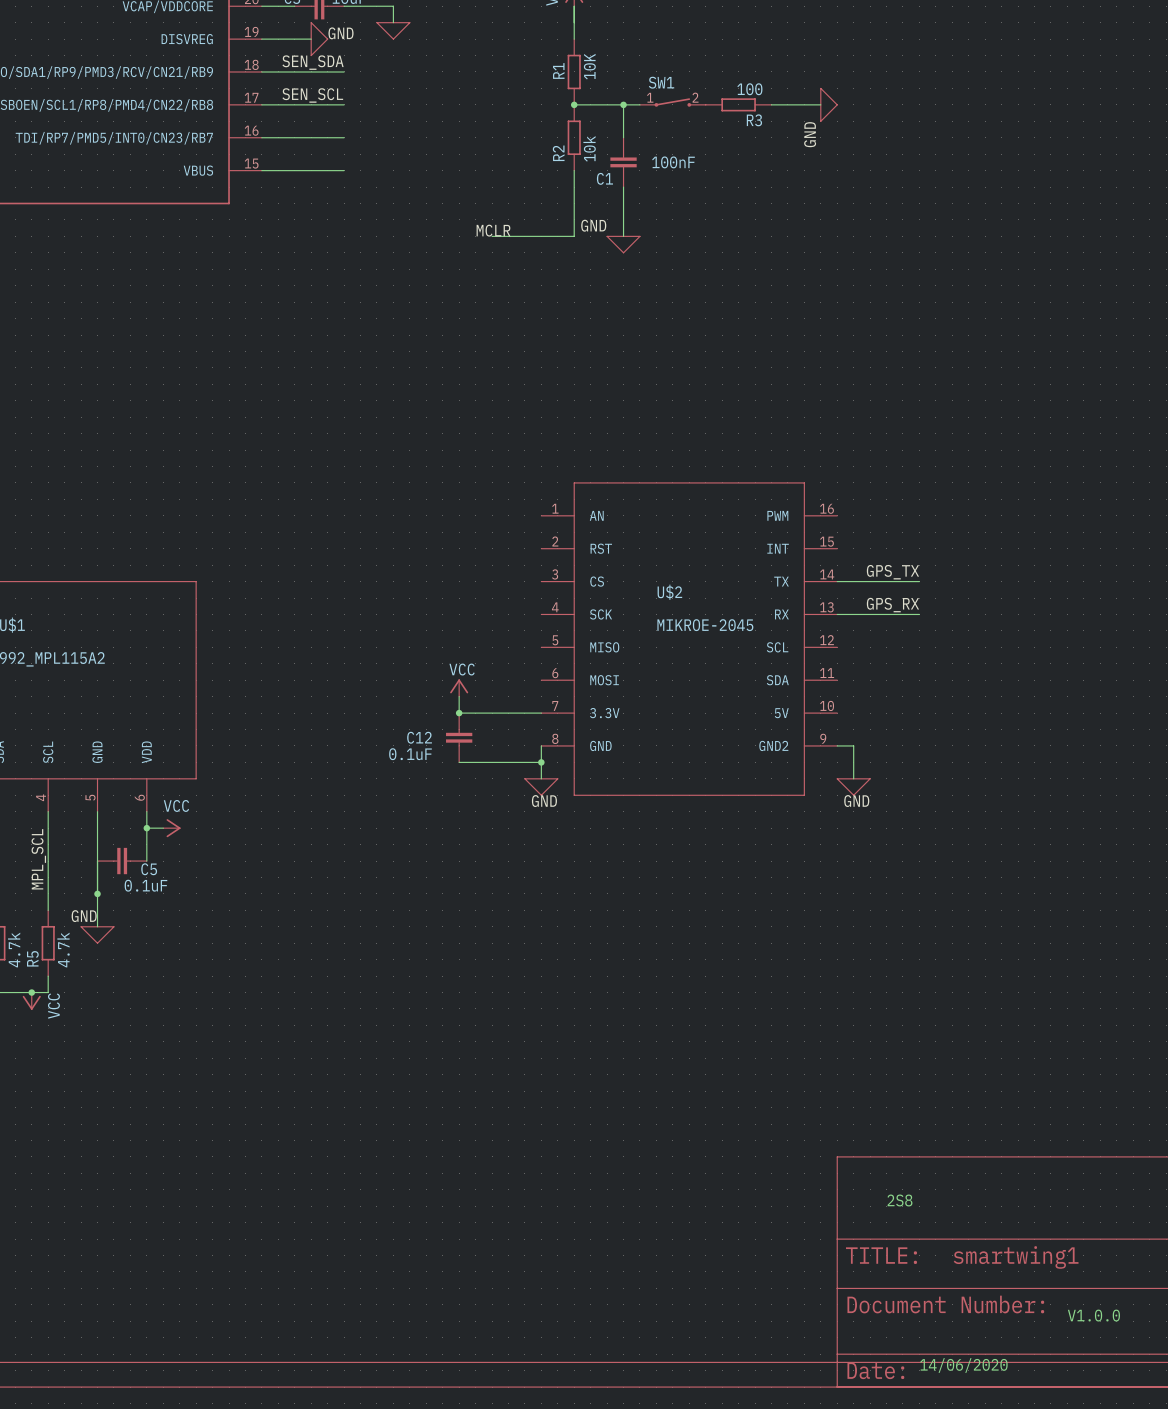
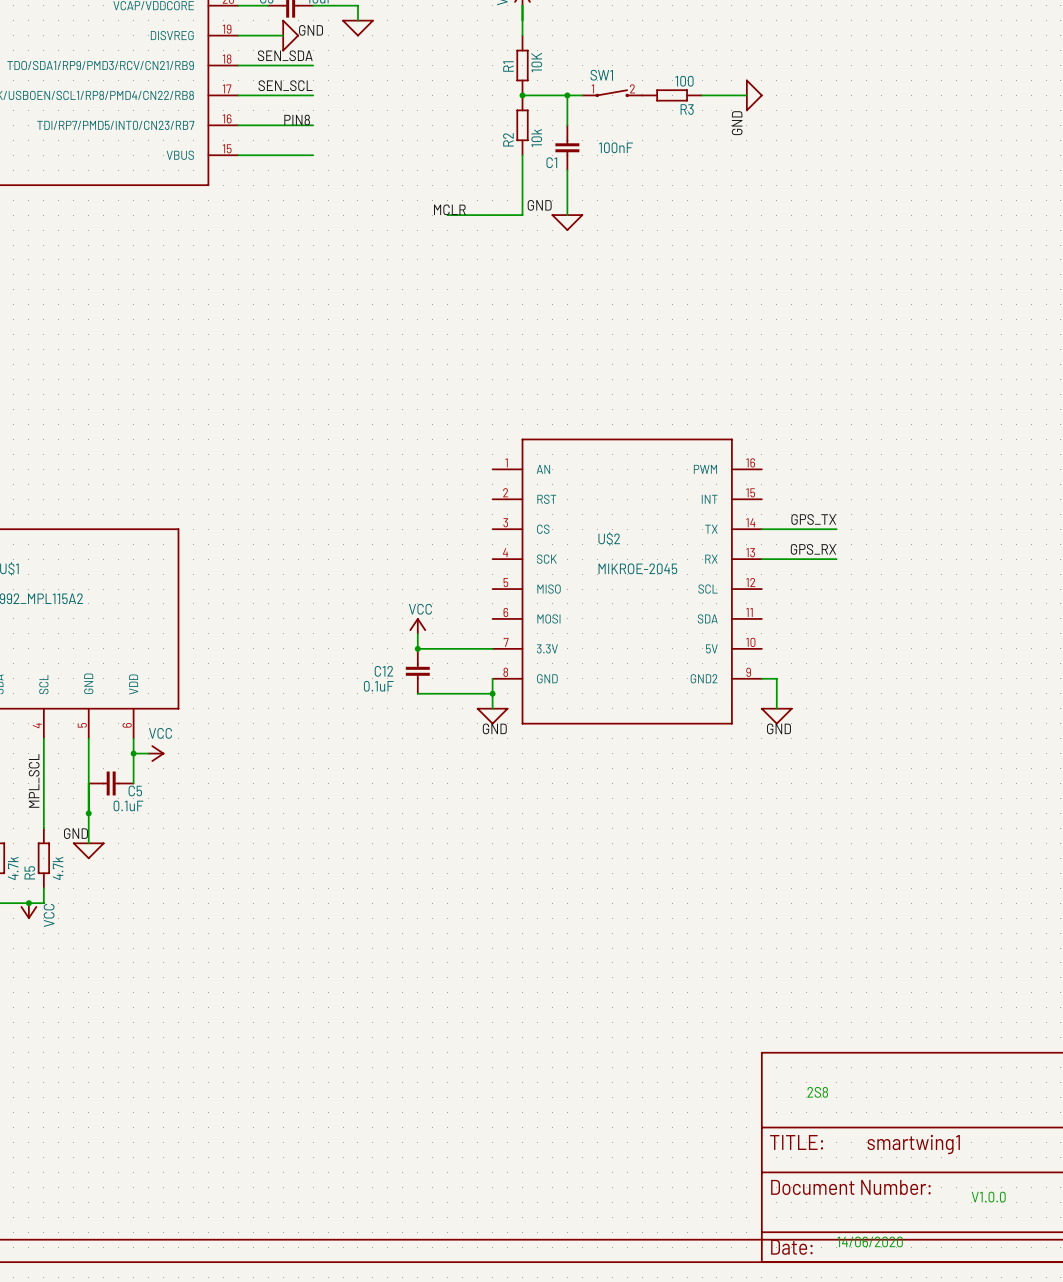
label: none -> PIN8 (297, 120)

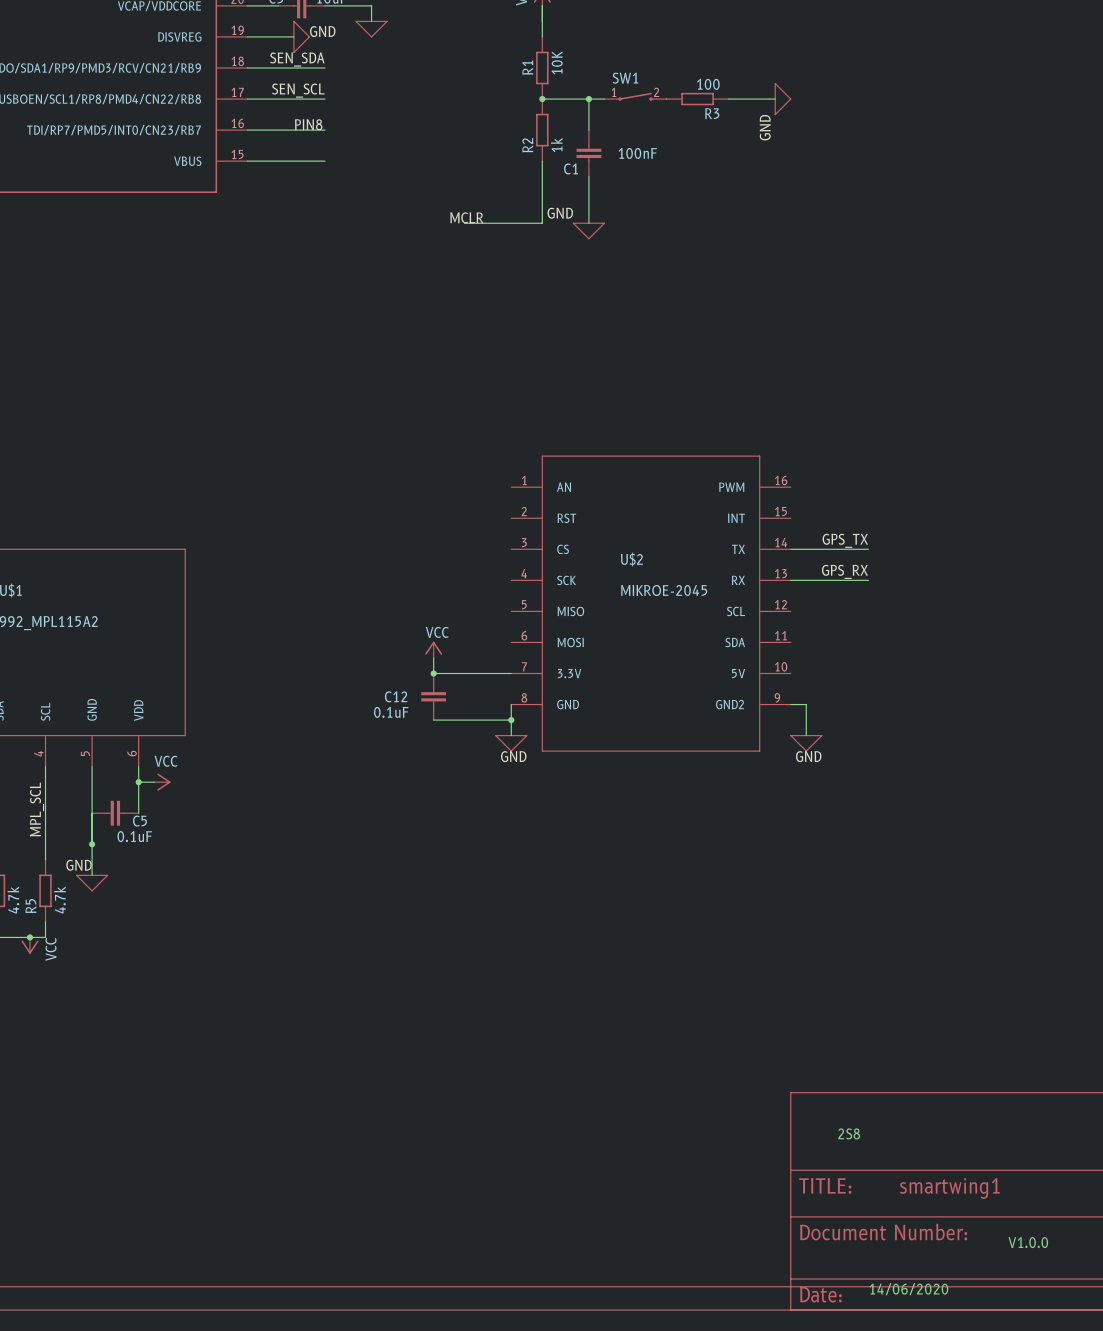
R2 value: 10k (536, 138) -> 1k (556, 145)

